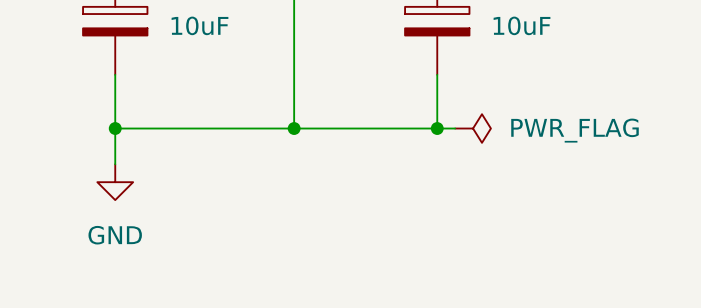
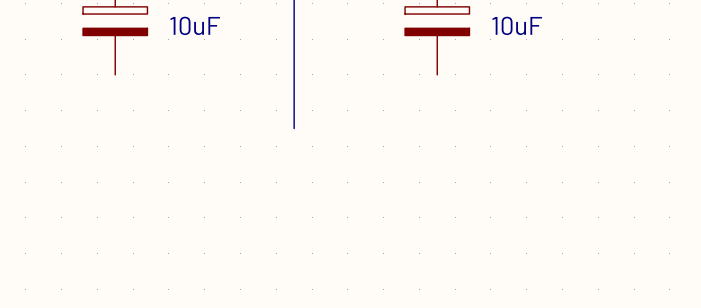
wire: (115, 74) (115, 164) -> none
wire: (437, 74) (437, 128) -> none
wire: (115, 128) (455, 128) -> none
junction: (115, 128) -> none
junction: (294, 128) -> none
junction: (437, 128) -> none
power symbol: PWR_FLAG (473, 128) -> none
power symbol: GND (115, 182) -> none

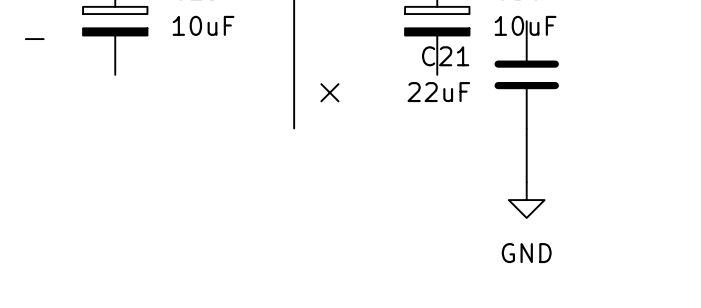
wire: none -> (25, 39) (43, 39)
C21: none -> 22uF (526, 74)
no-connect mark: none -> (329, 92)
wire: none -> (526, 128) (526, 182)
power symbol: none -> GND (526, 200)

